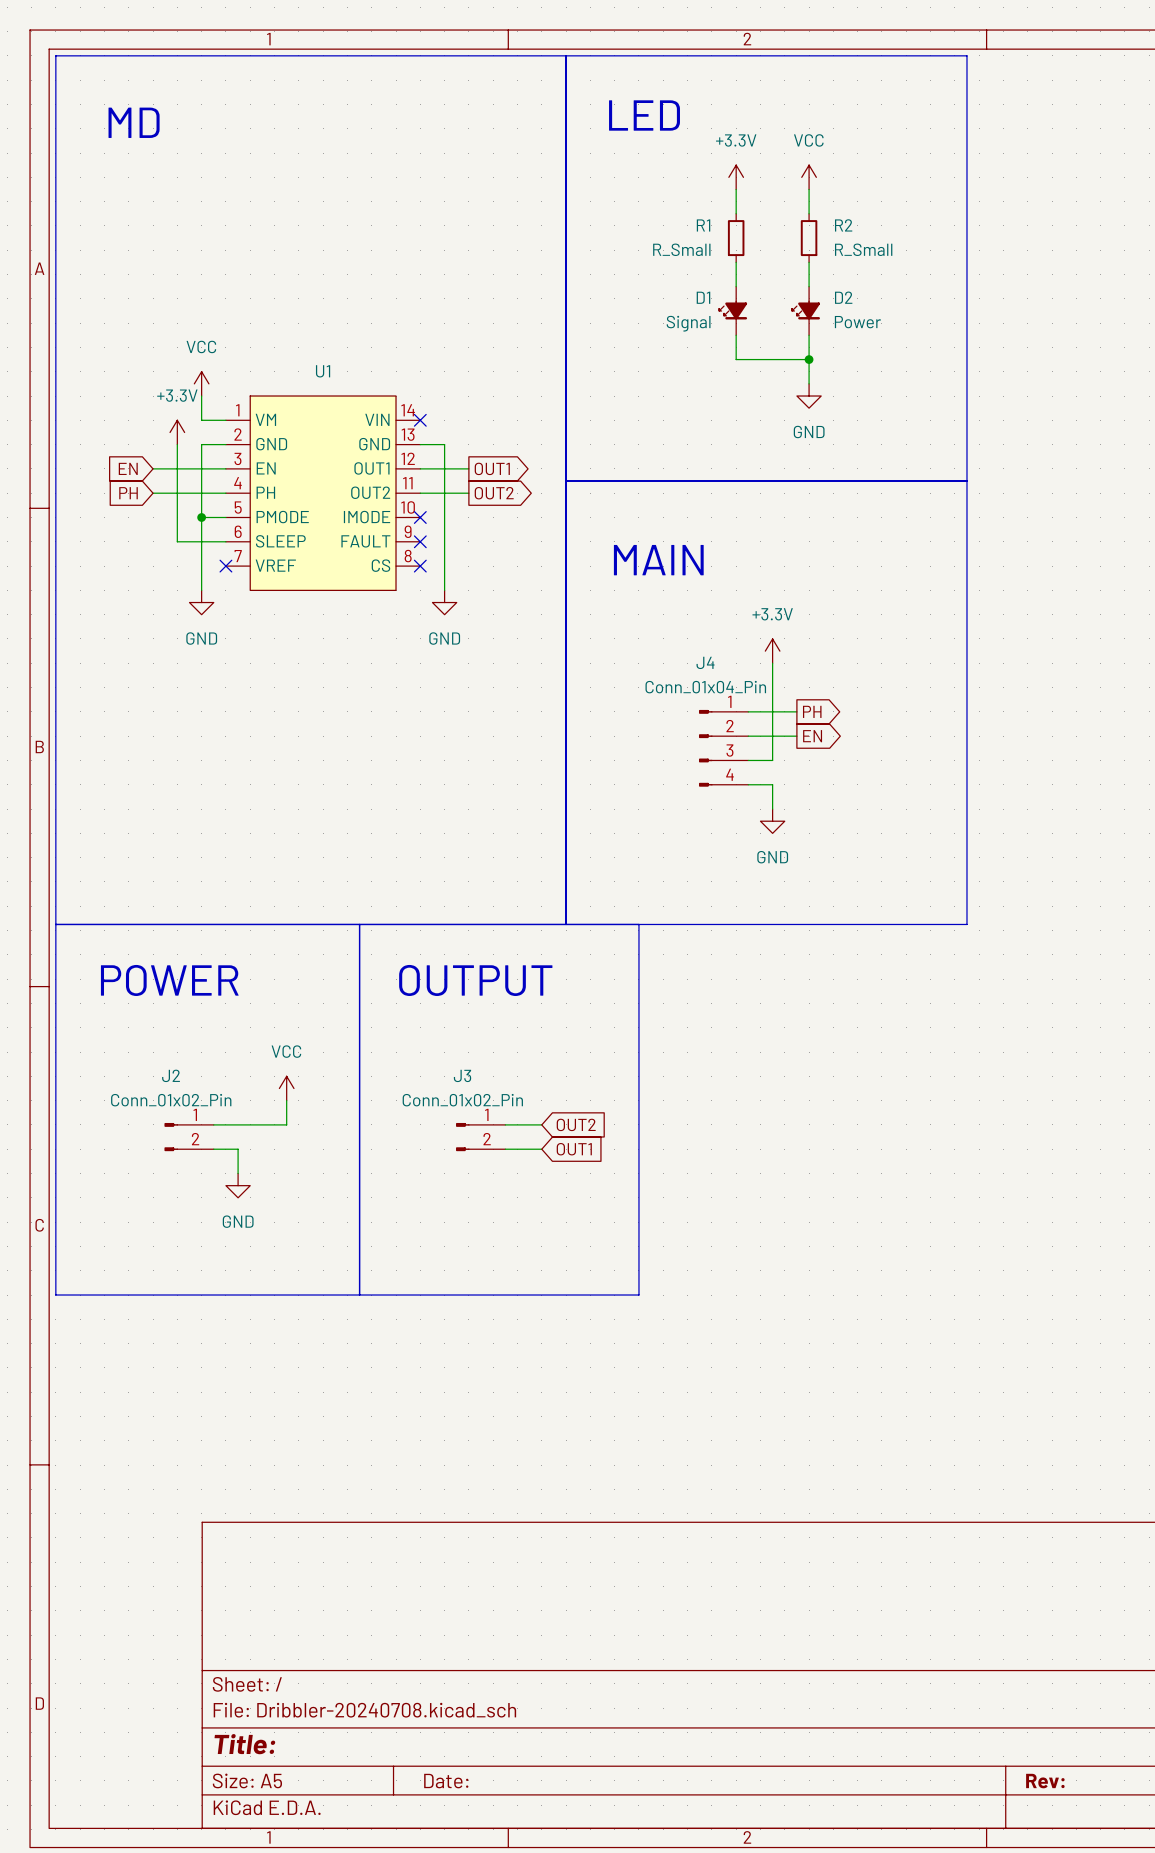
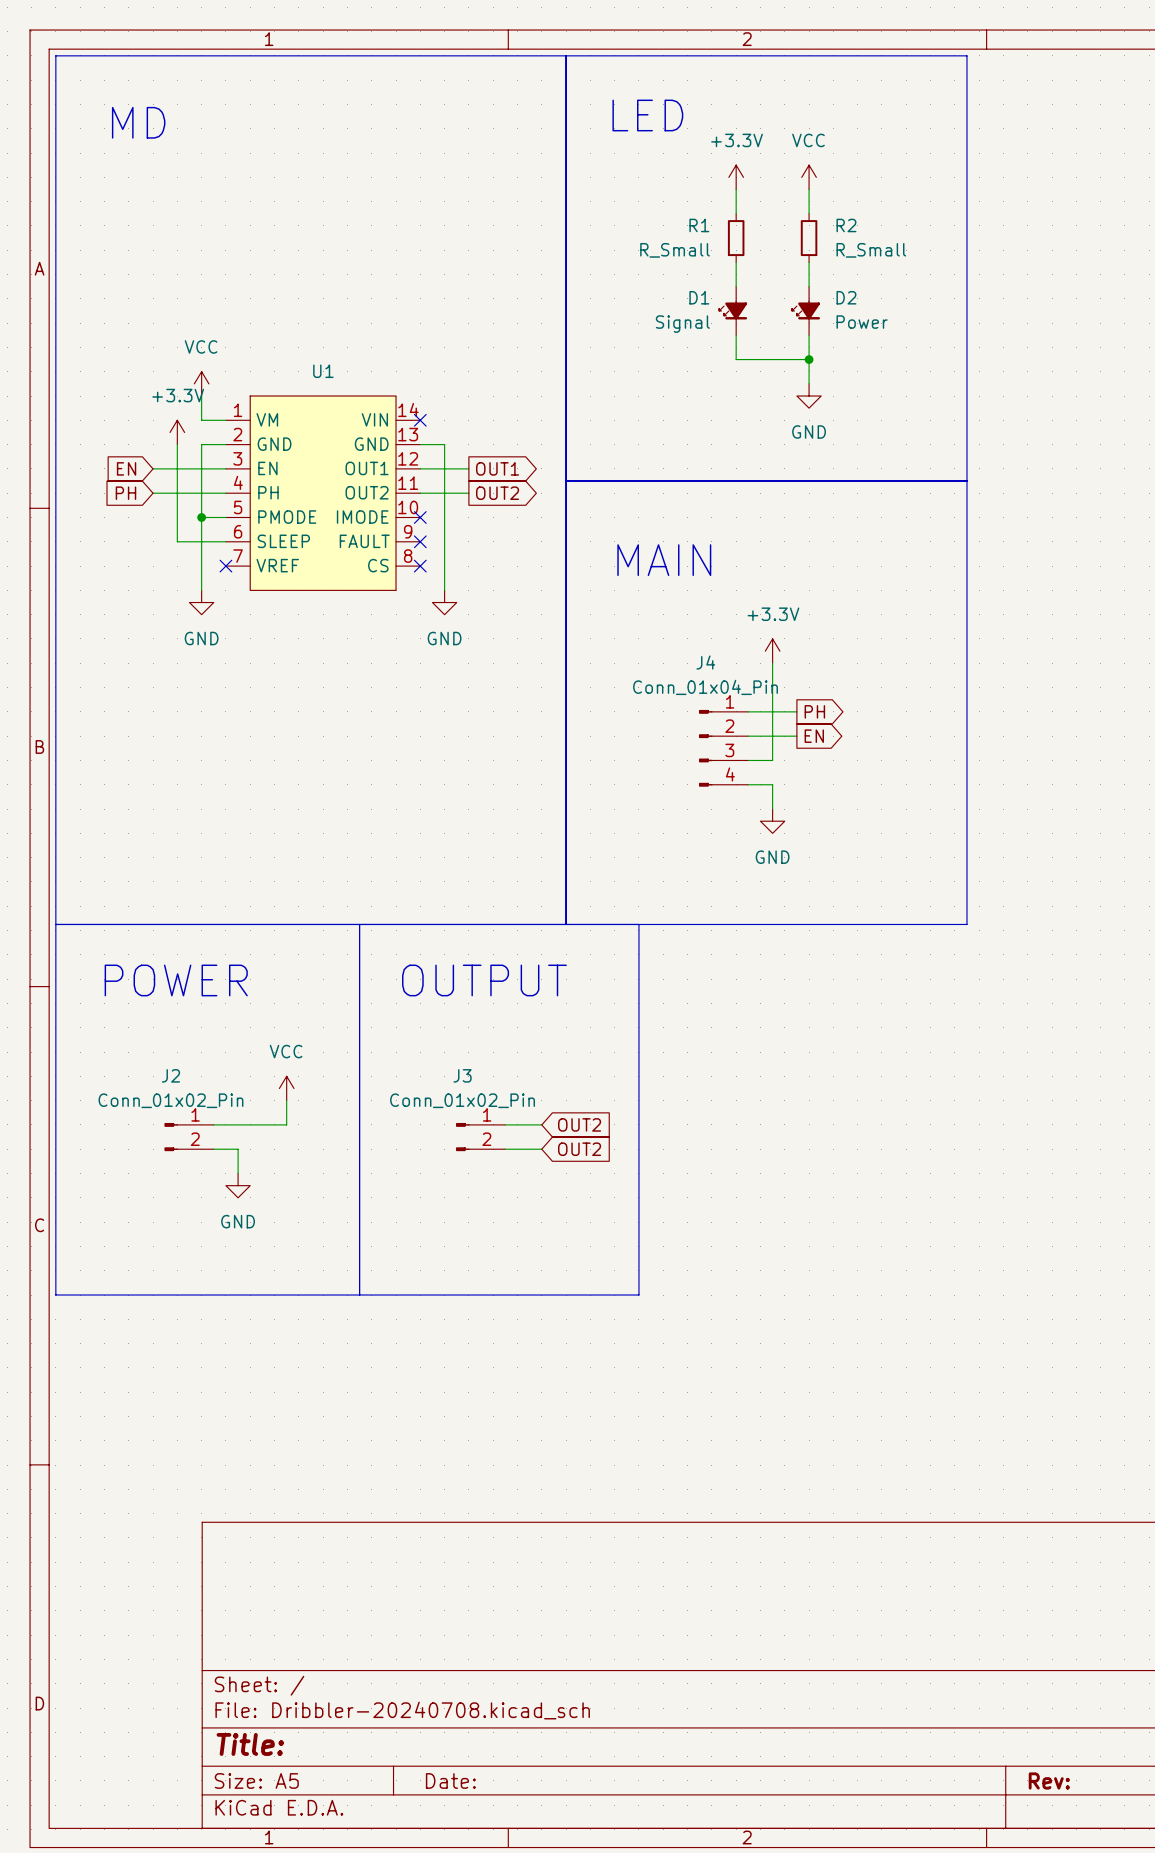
global label: OUT1 (574, 1149) -> OUT2 (579, 1149)

